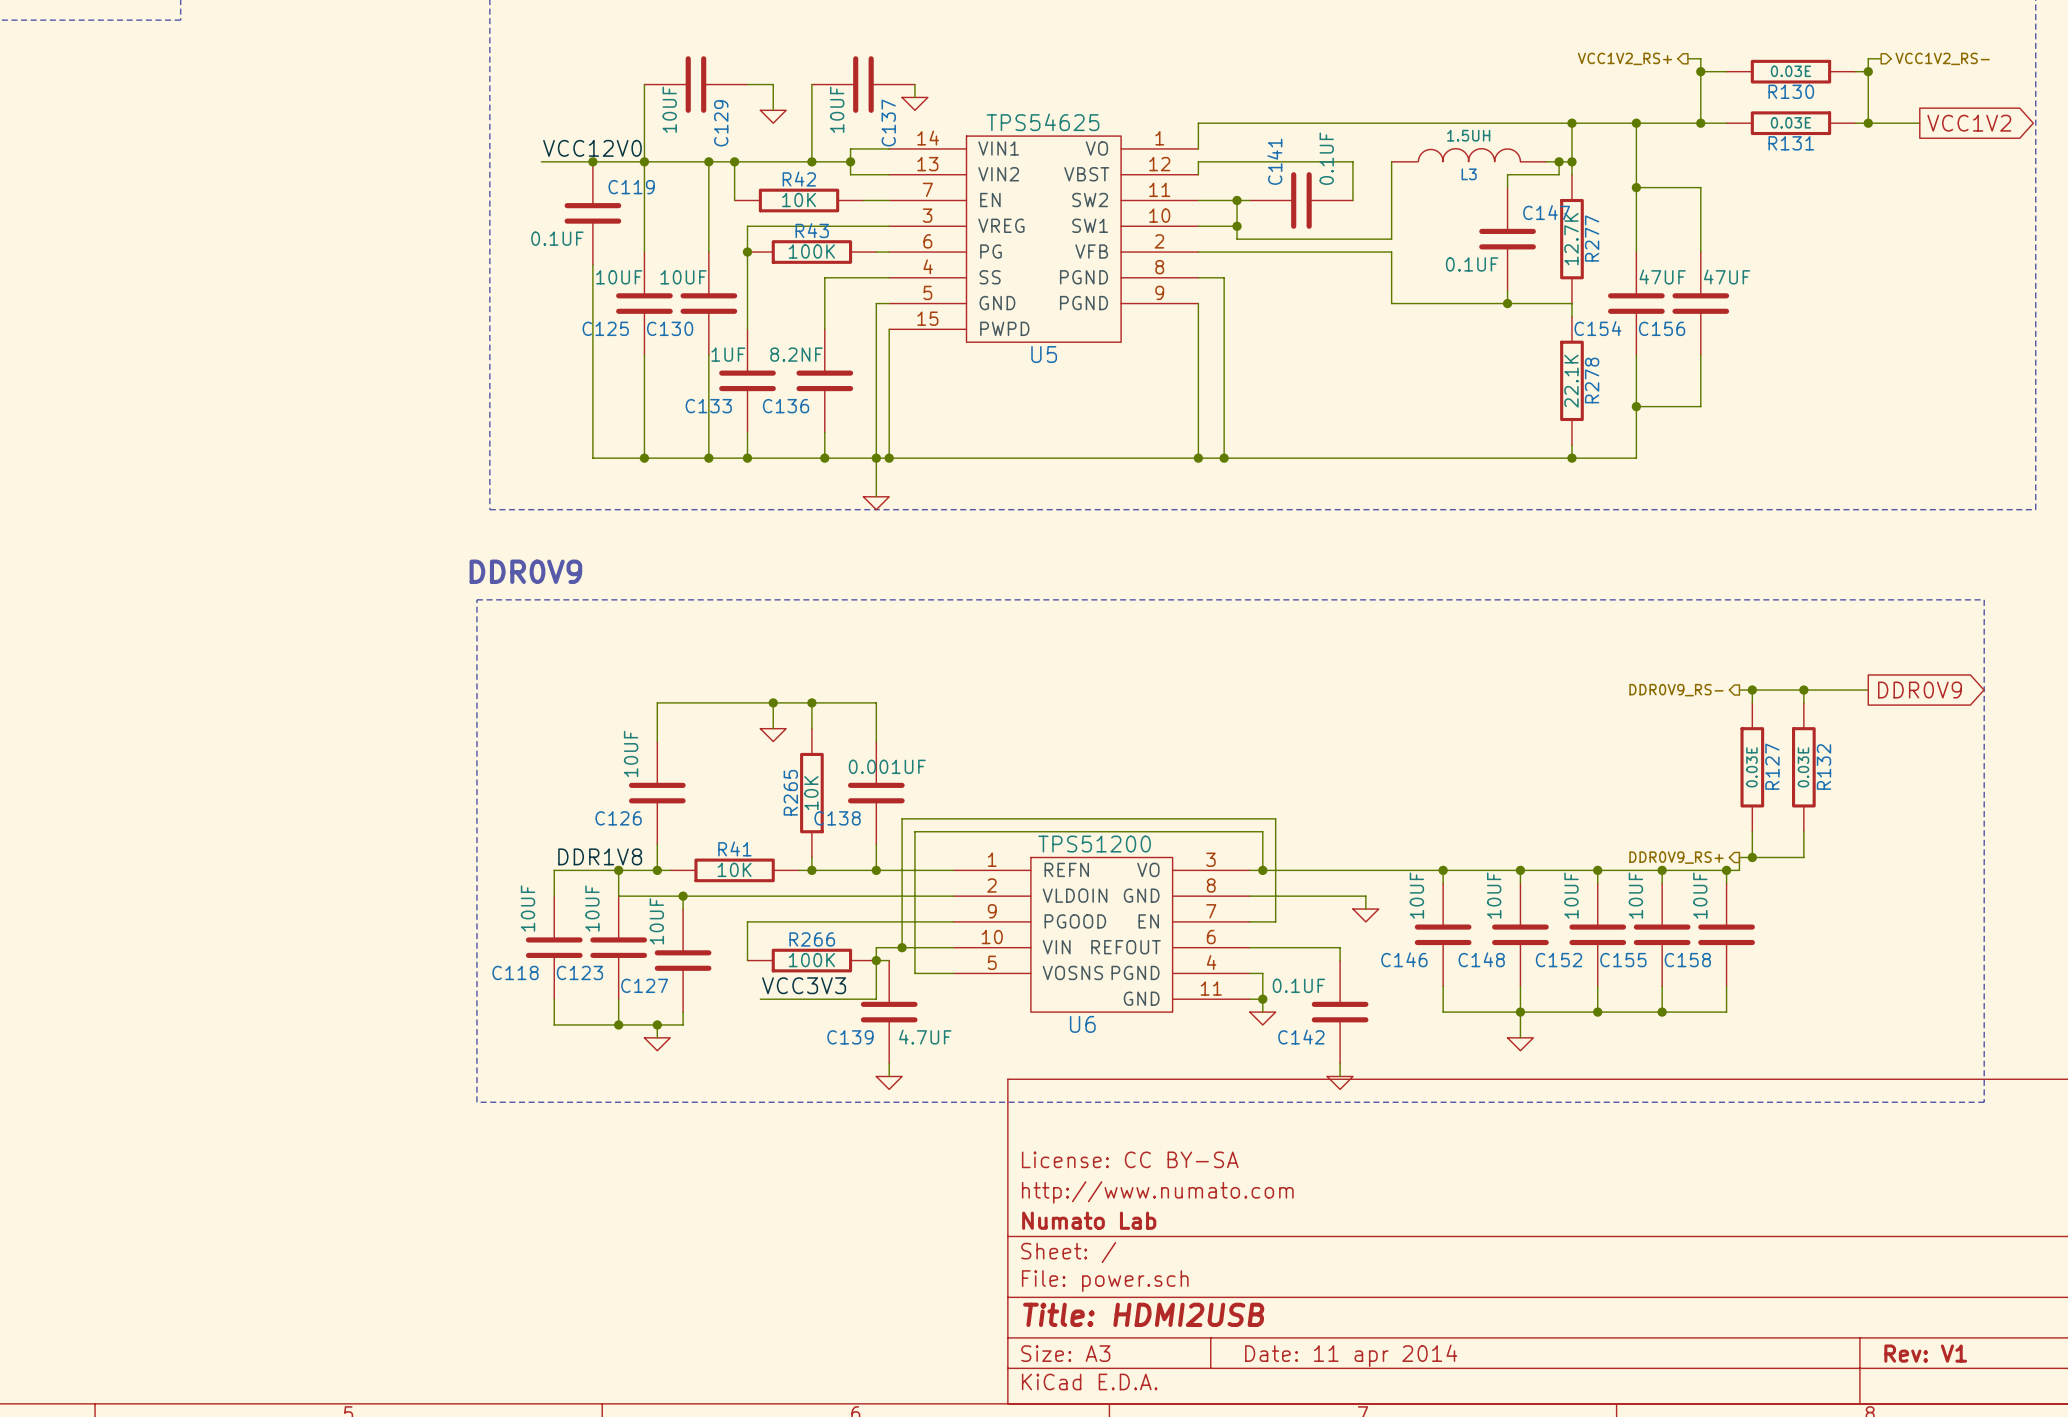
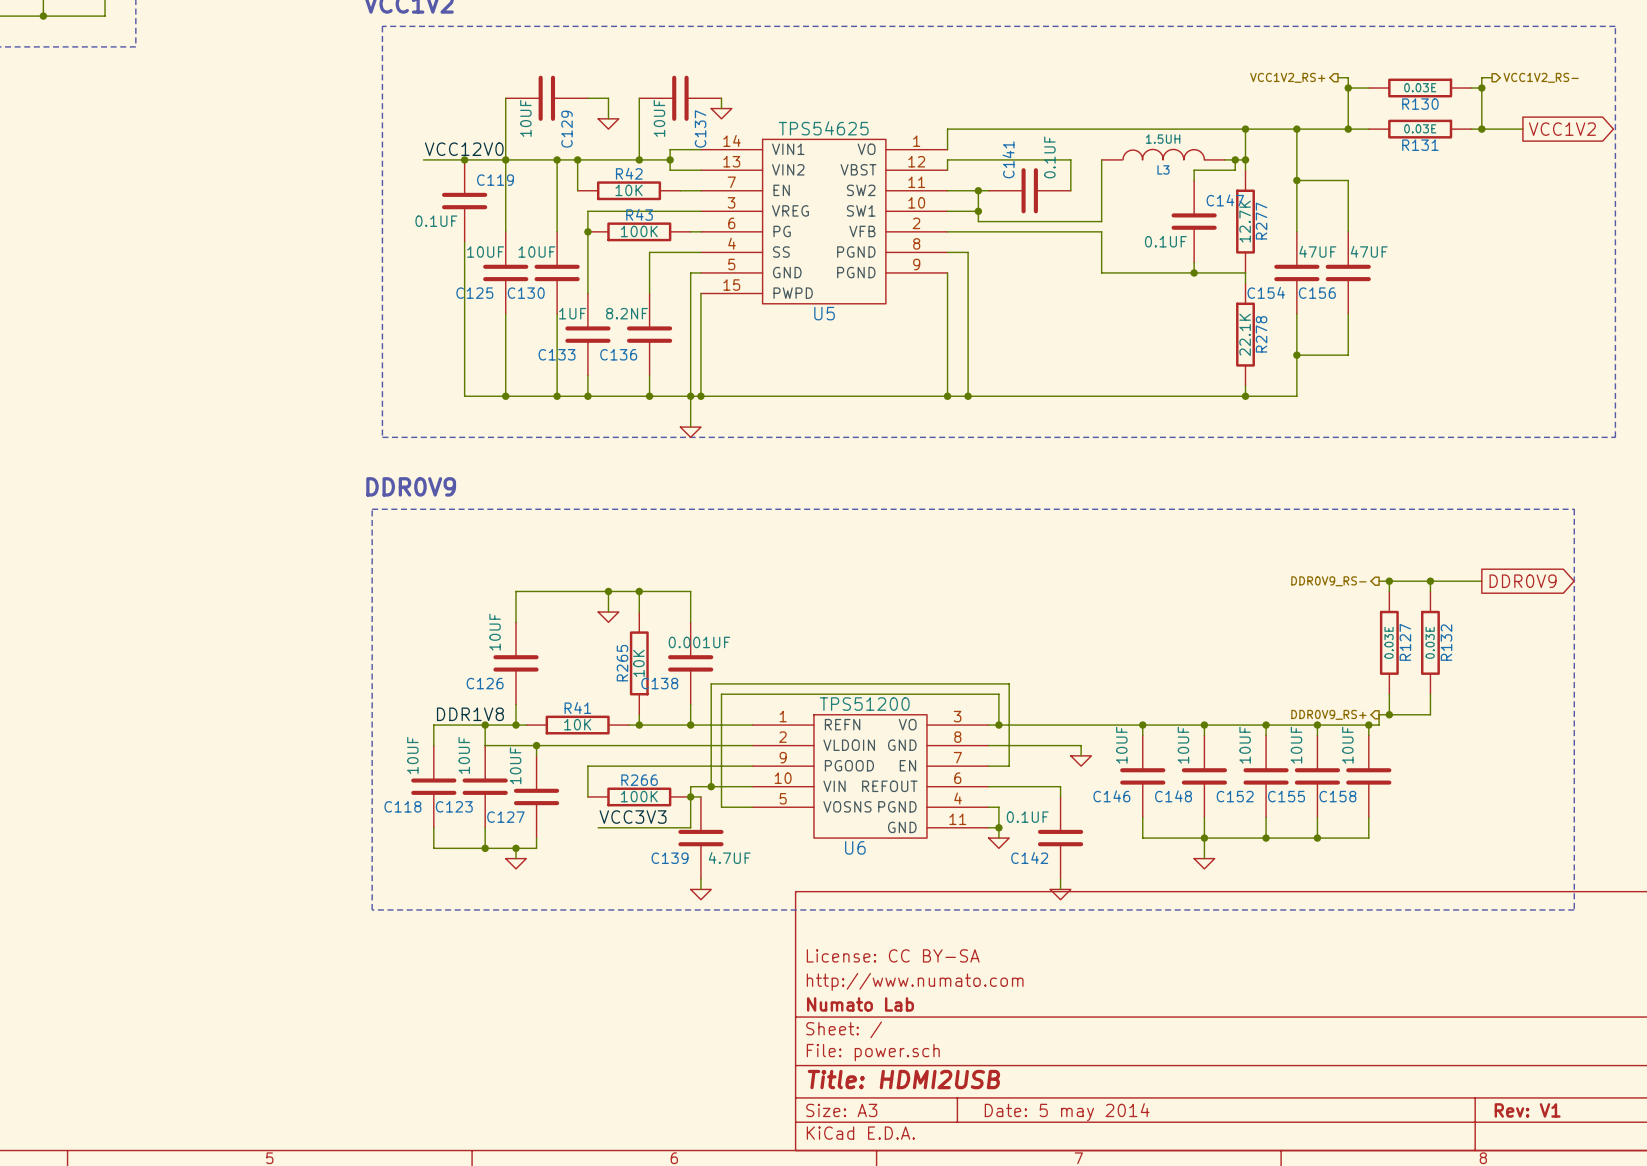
title block: Date: 11 apr 2014 (1351, 1355) -> Date: 5 may 2014 (1067, 1112)

